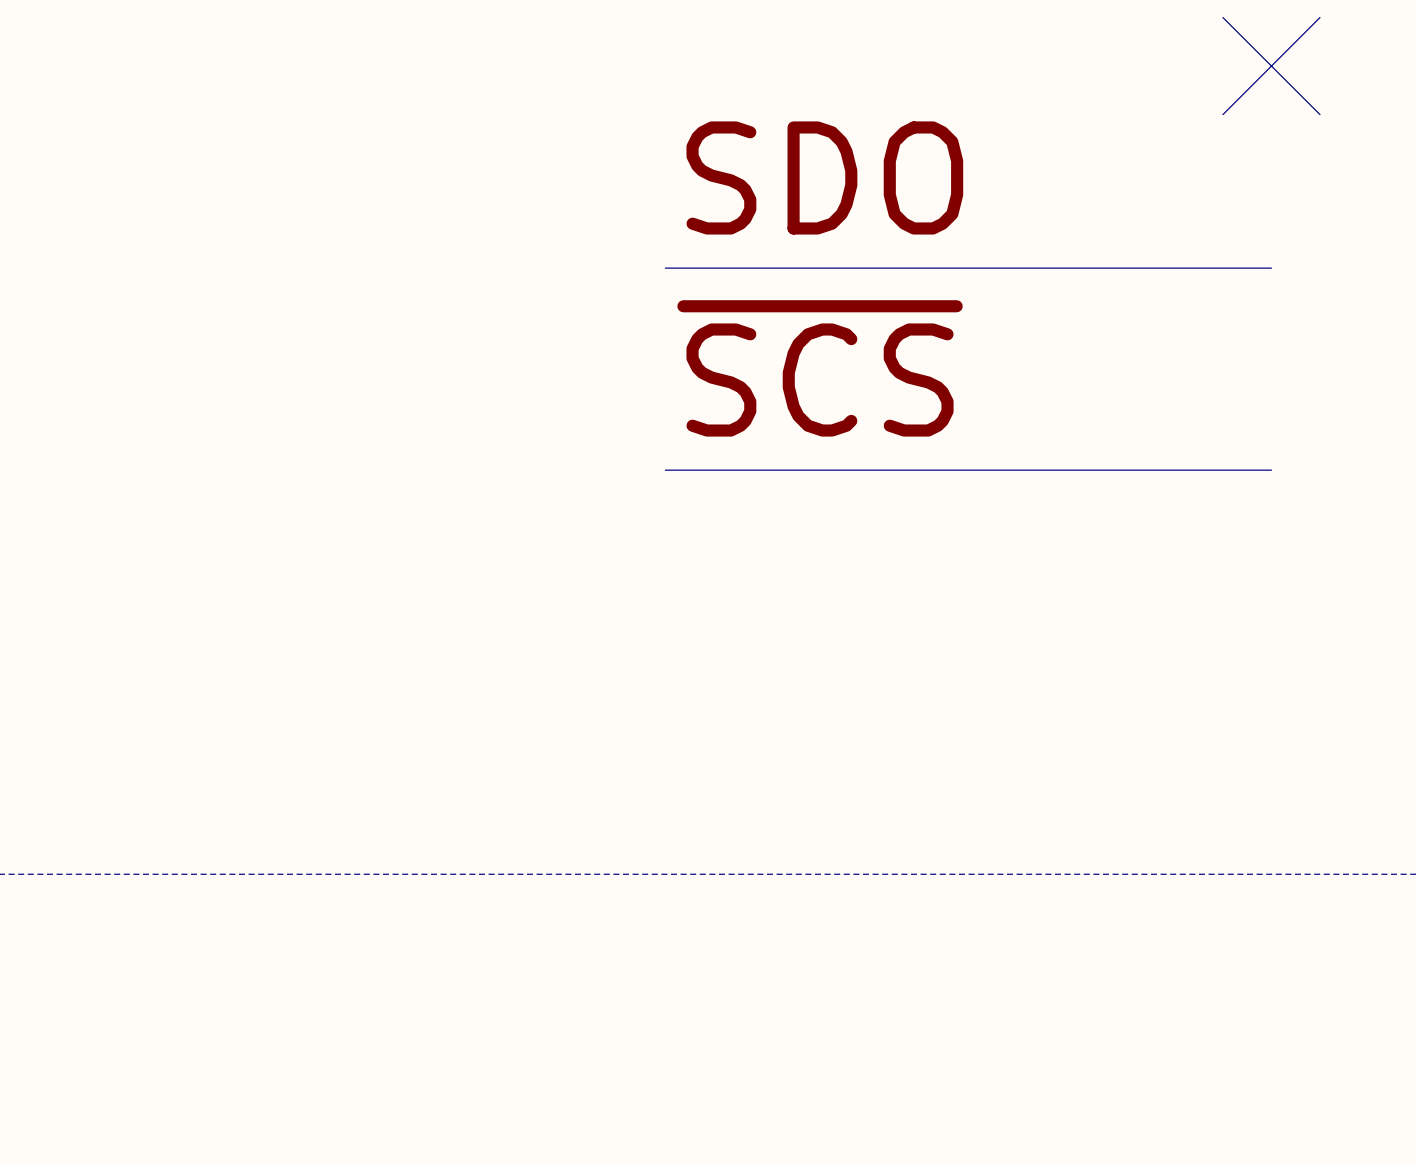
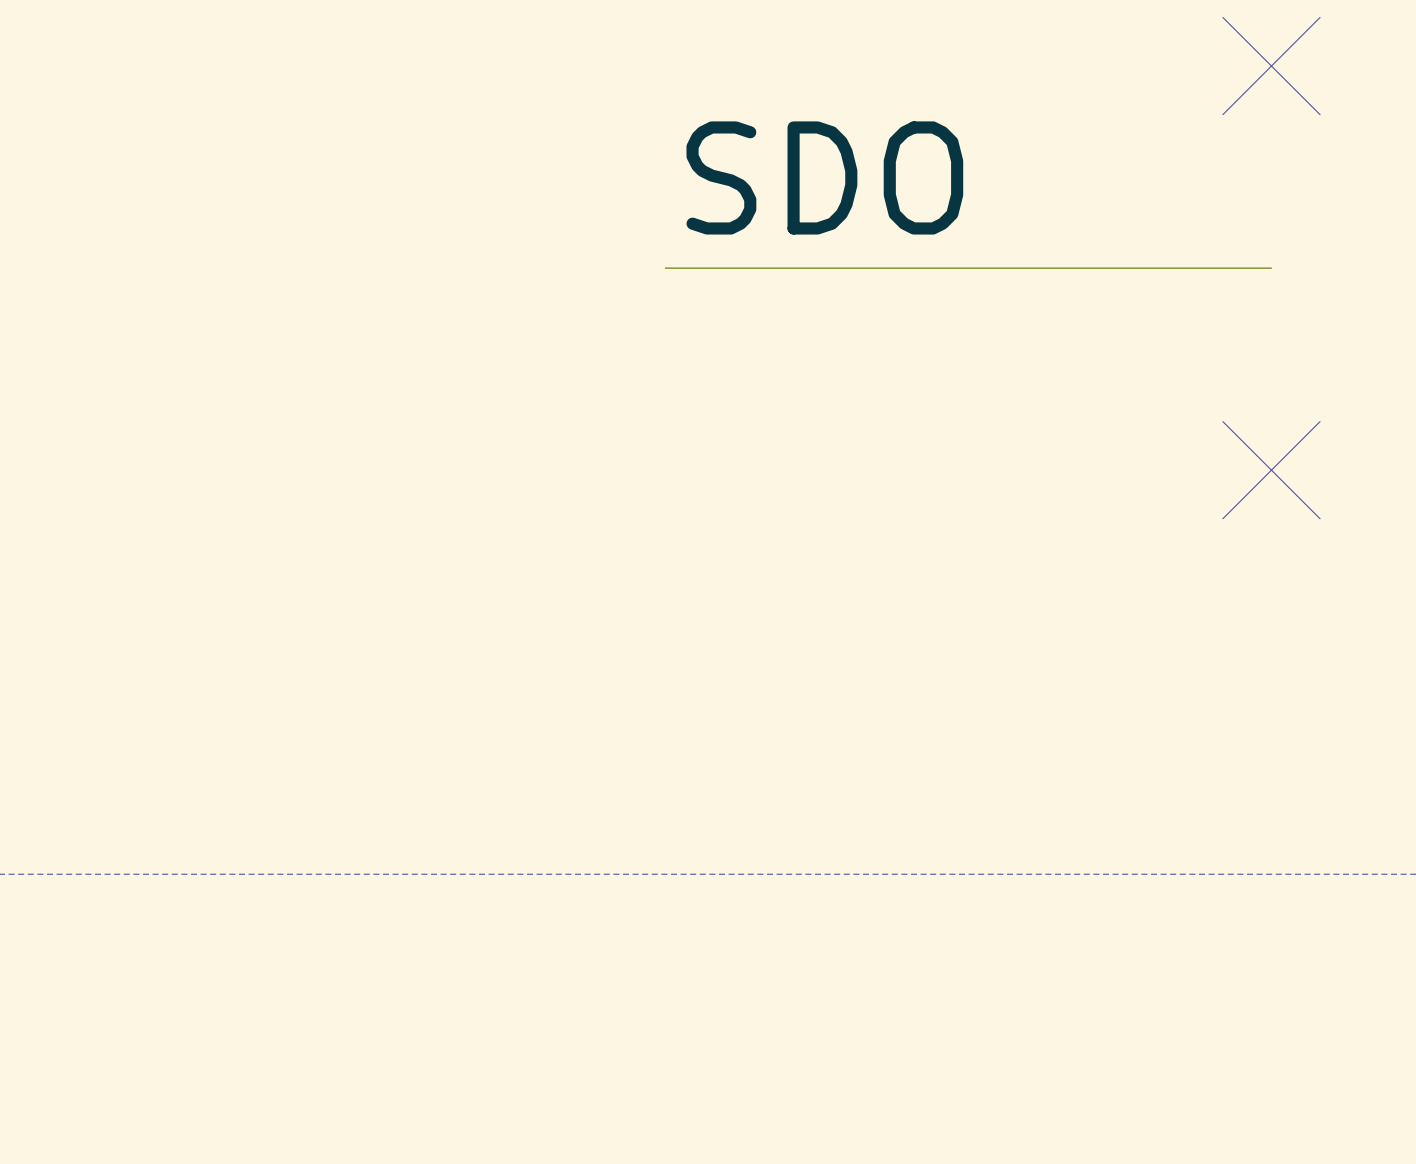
label: ~{SCS} (820, 368) -> none
wire: (665, 470) (1271, 470) -> none
no-connect mark: none -> (1271, 470)

